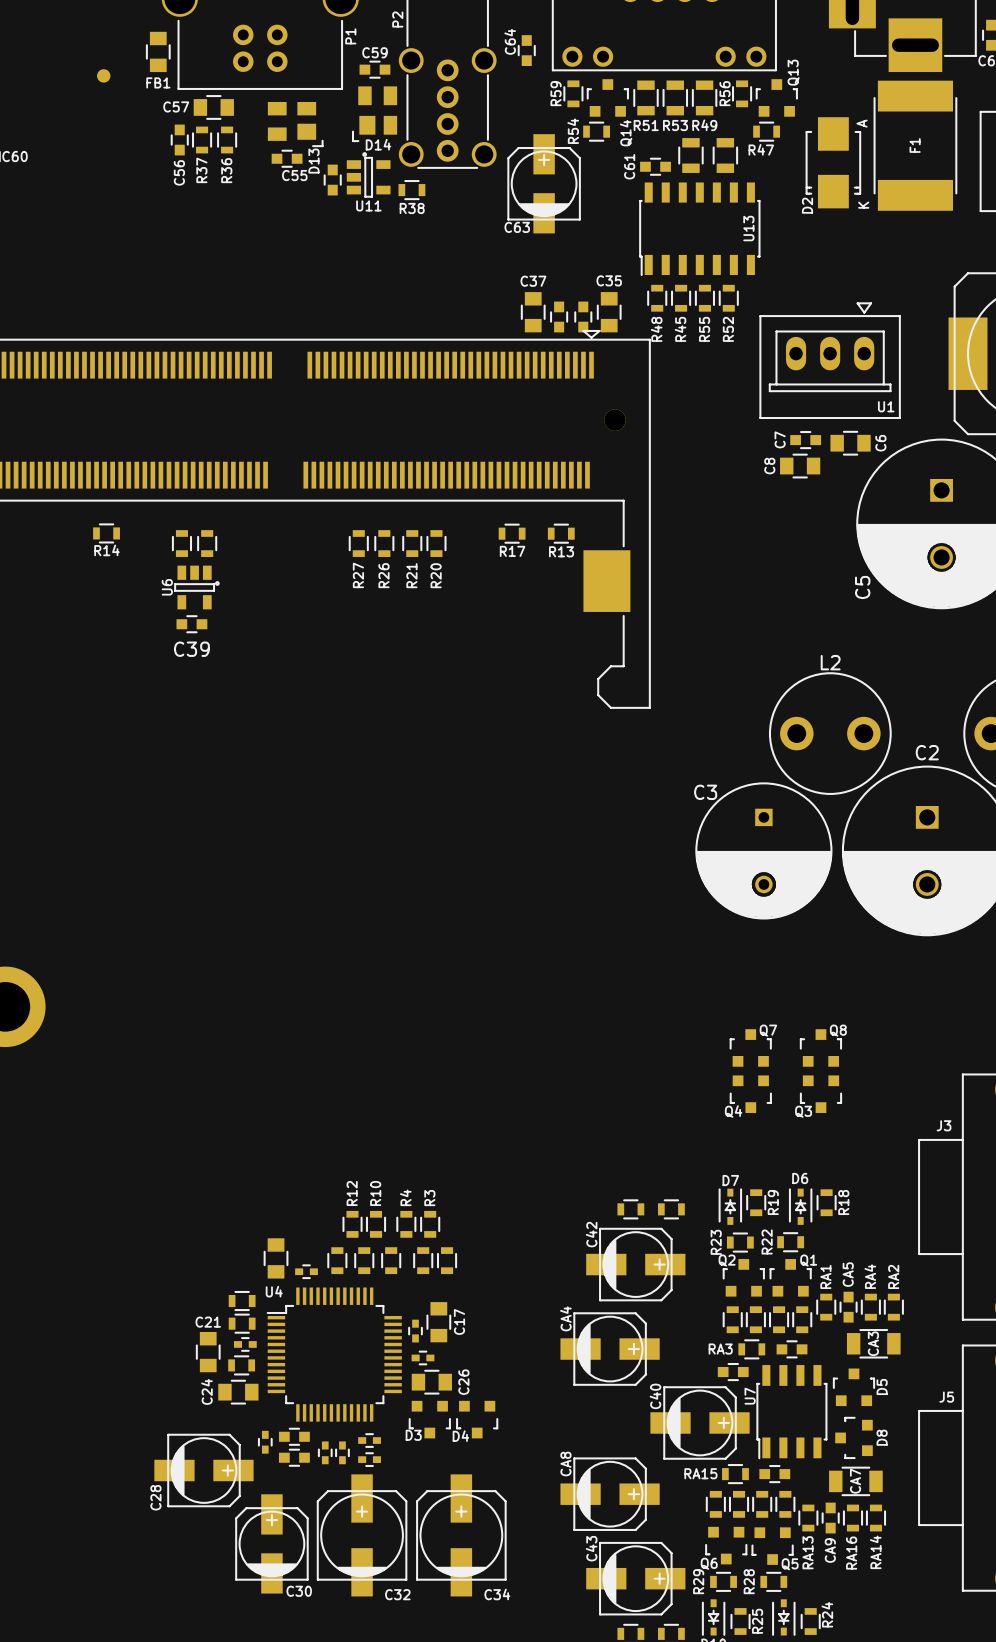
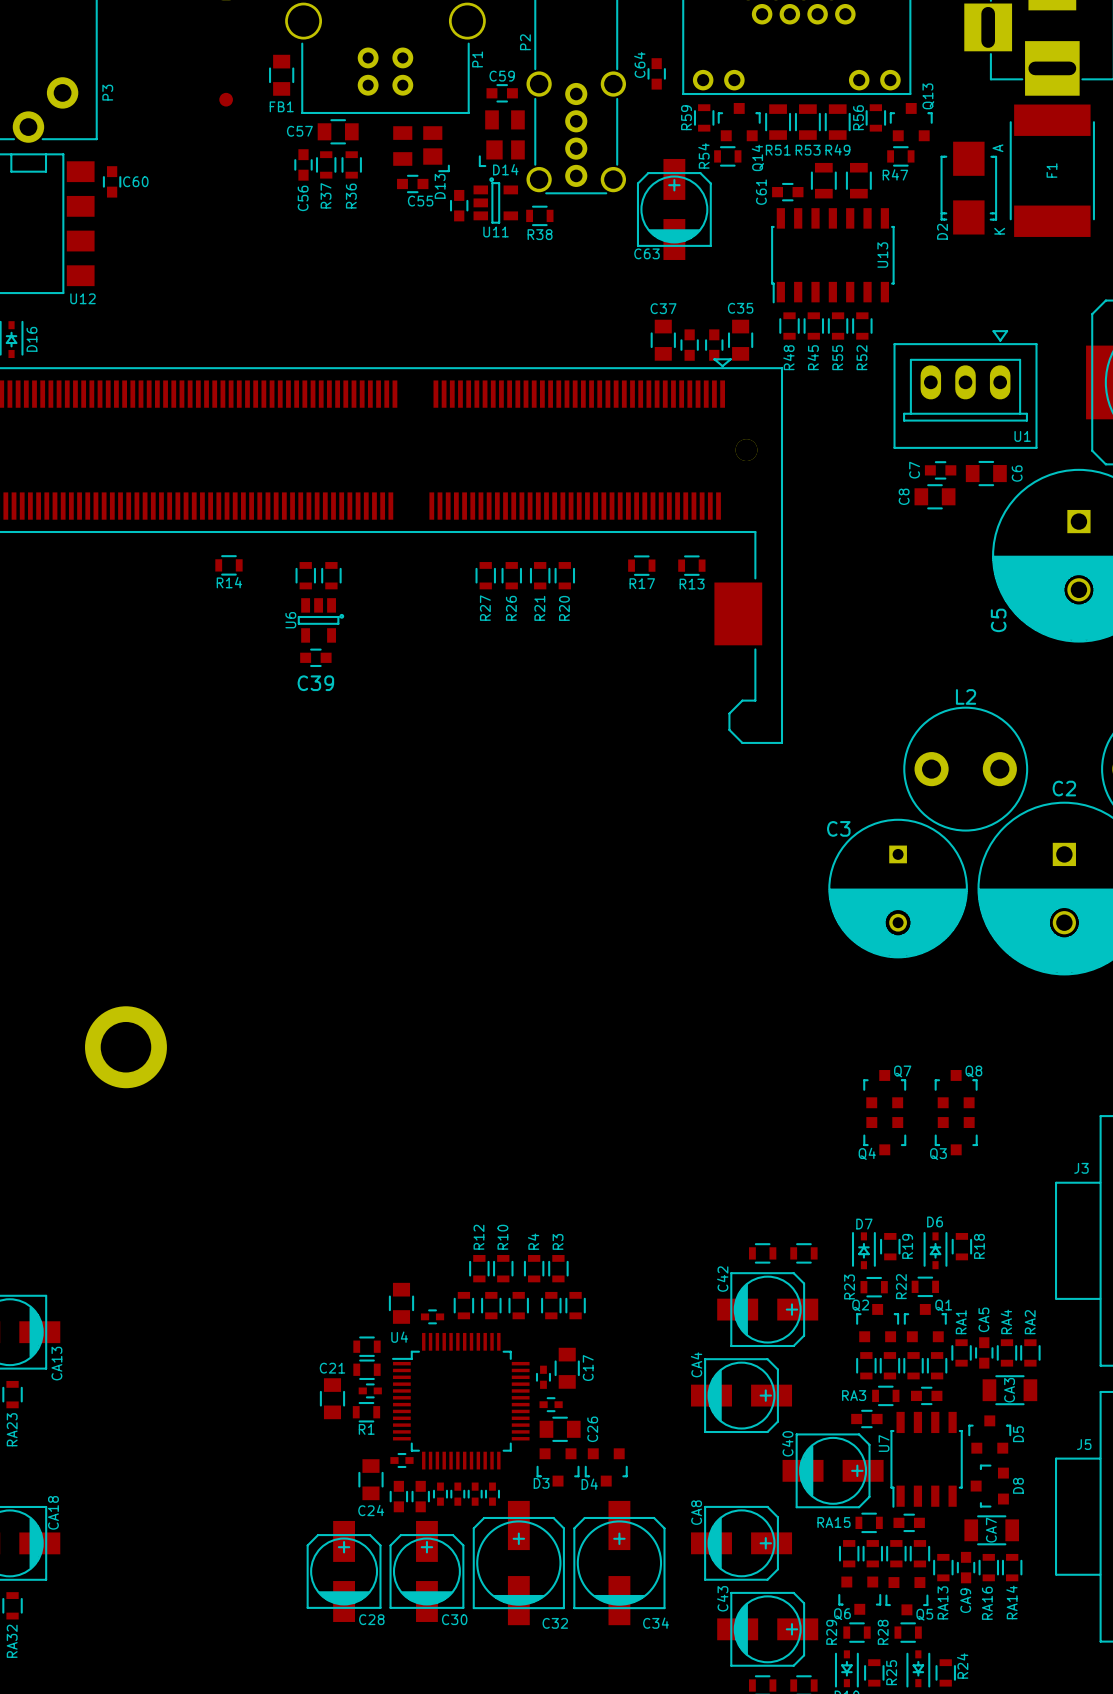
R1 name: none -> R1 (366, 1429)
C24 name position: C24 (206, 1391) -> C24 (371, 1510)
C24 rotation: 0° (238, 1392) -> 90° clockwise (370, 1479)
C24 position: (238, 1392) -> (370, 1479)
part: none -> (401, 1460)
part footprint: [257, 1430, 273, 1454] -> [389, 1480, 409, 1513]
part: (294, 1436) -> none
part rotation: 0° (369, 1440) -> 90° clockwise (492, 1494)
part: none -> (440, 1494)
part: none -> (457, 1494)
part: none -> (475, 1494)
part: none -> (420, 1496)
part: (325, 1452) -> none
part: (342, 1452) -> none
part: (294, 1457) -> none
part: (369, 1459) -> none
C28 rotation: 0° (203, 1470) -> 90° counterclockwise (344, 1571)
C32 position: (362, 1535) -> (518, 1563)
C34 position: (461, 1535) -> (619, 1563)
C30 position: (271, 1543) -> (426, 1571)

